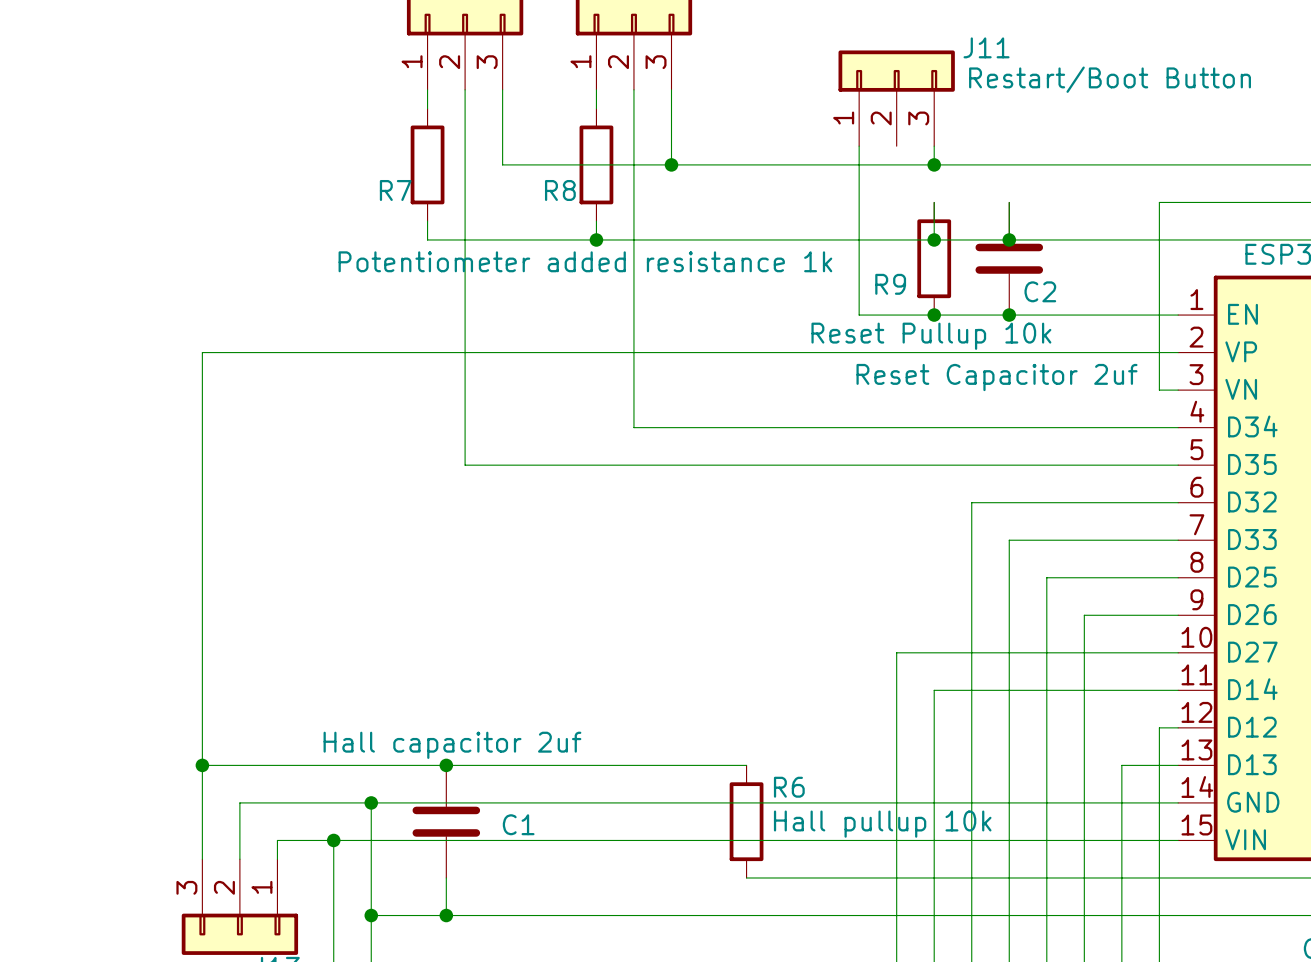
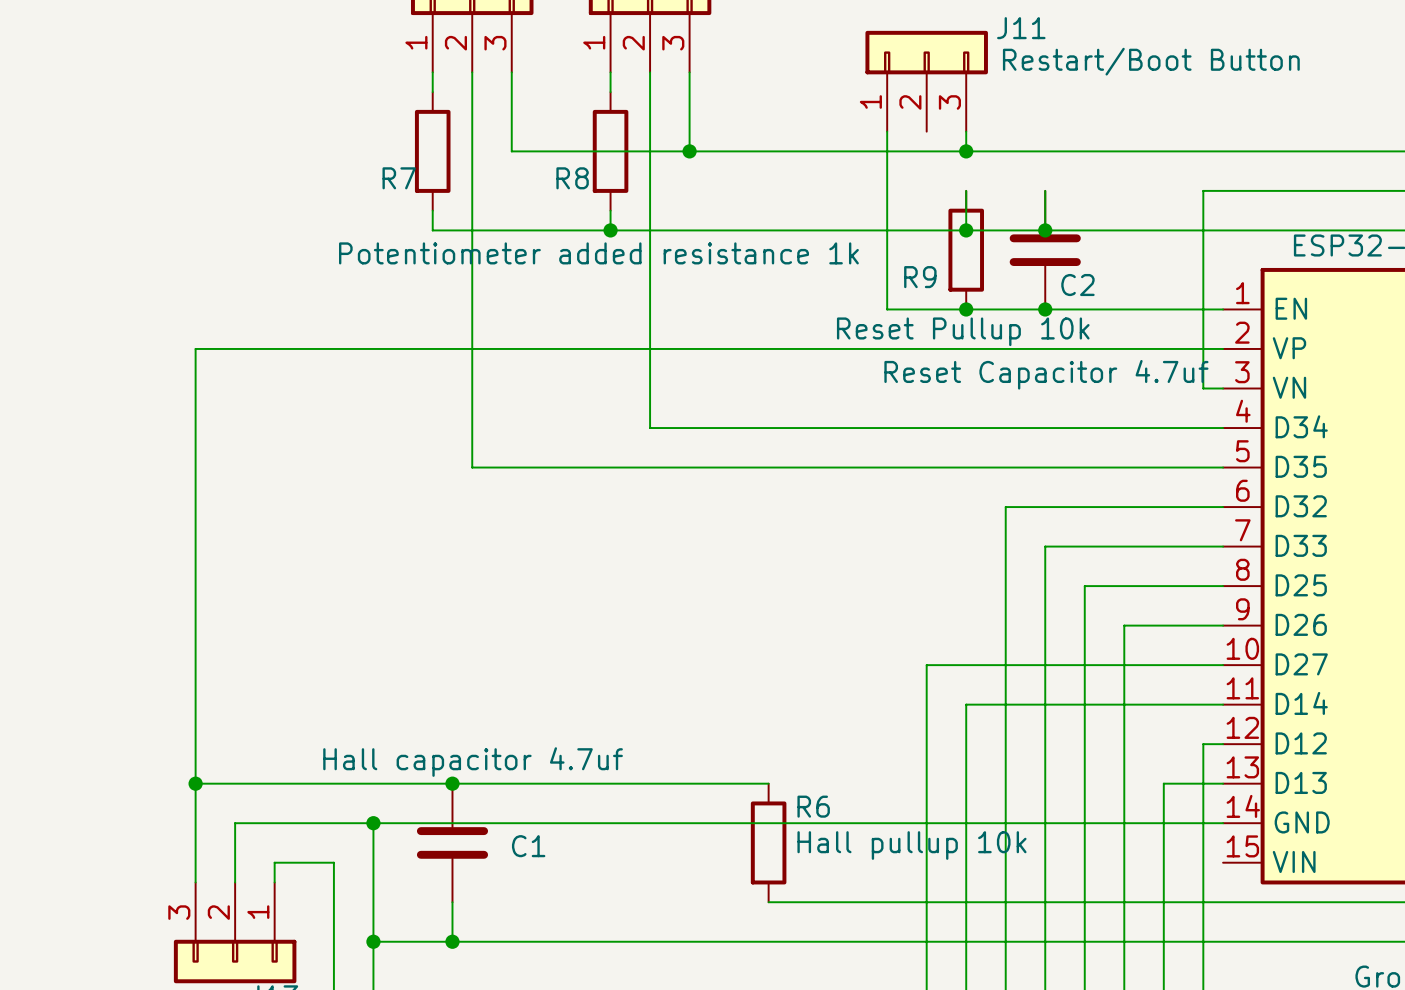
C2 value: Reset Capacitor 2uf (996, 377) -> Reset Capacitor 4.7uf (1046, 374)
C1 value: Hall capacitor 2uf (452, 745) -> Hall capacitor 4.7uf (473, 762)
wire: (333, 840) (1178, 840) -> none
junction: (333, 840) -> none

